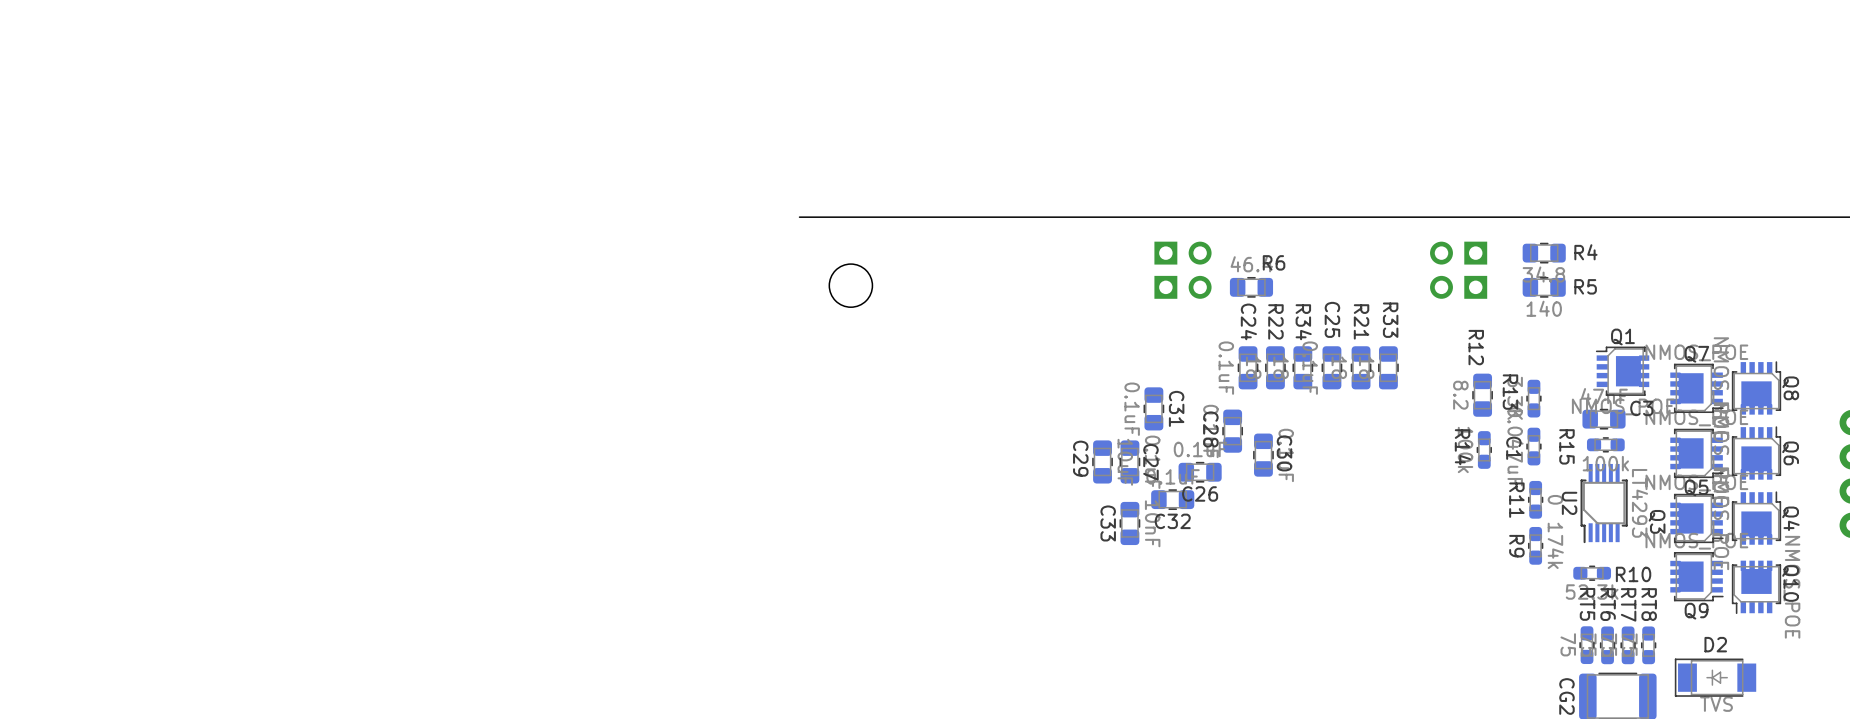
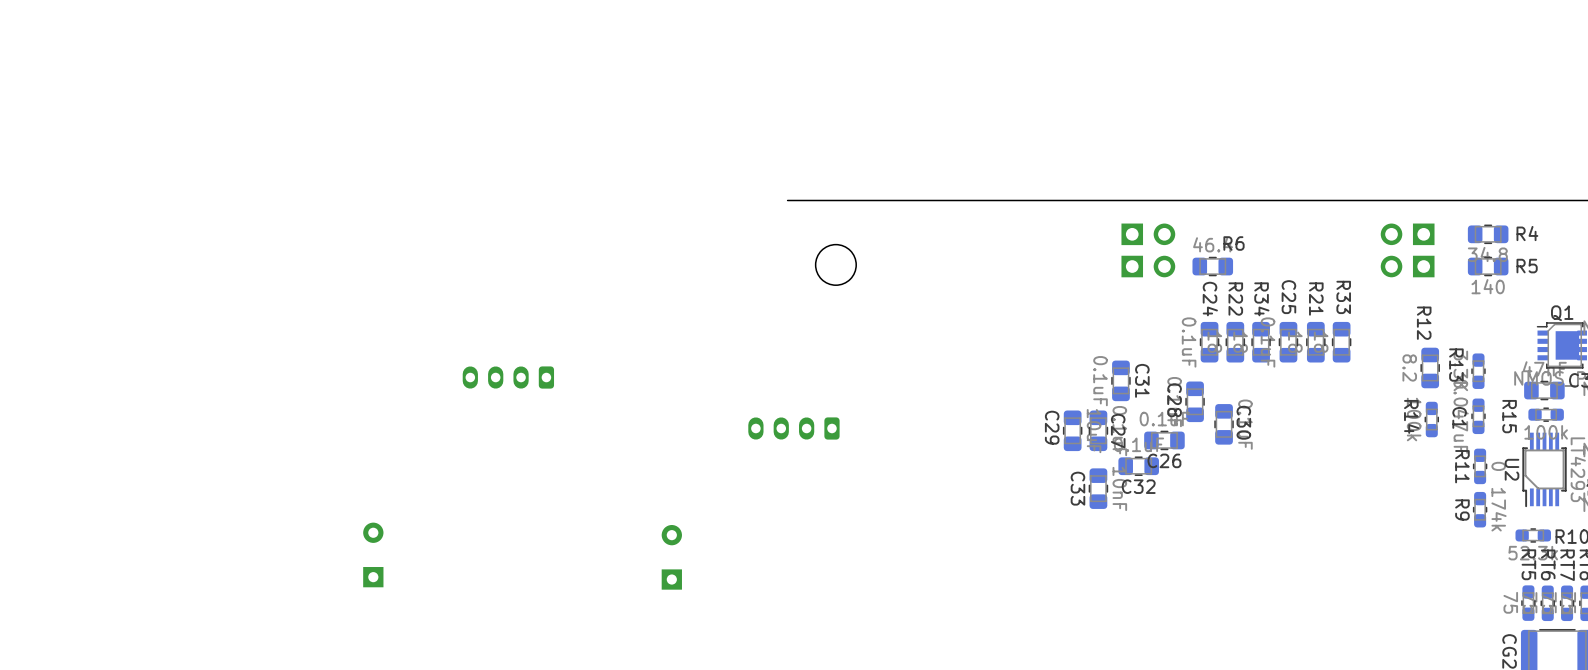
part: none -> (508, 377)
part: none -> (793, 428)
part: none -> (373, 554)
part: none -> (671, 557)

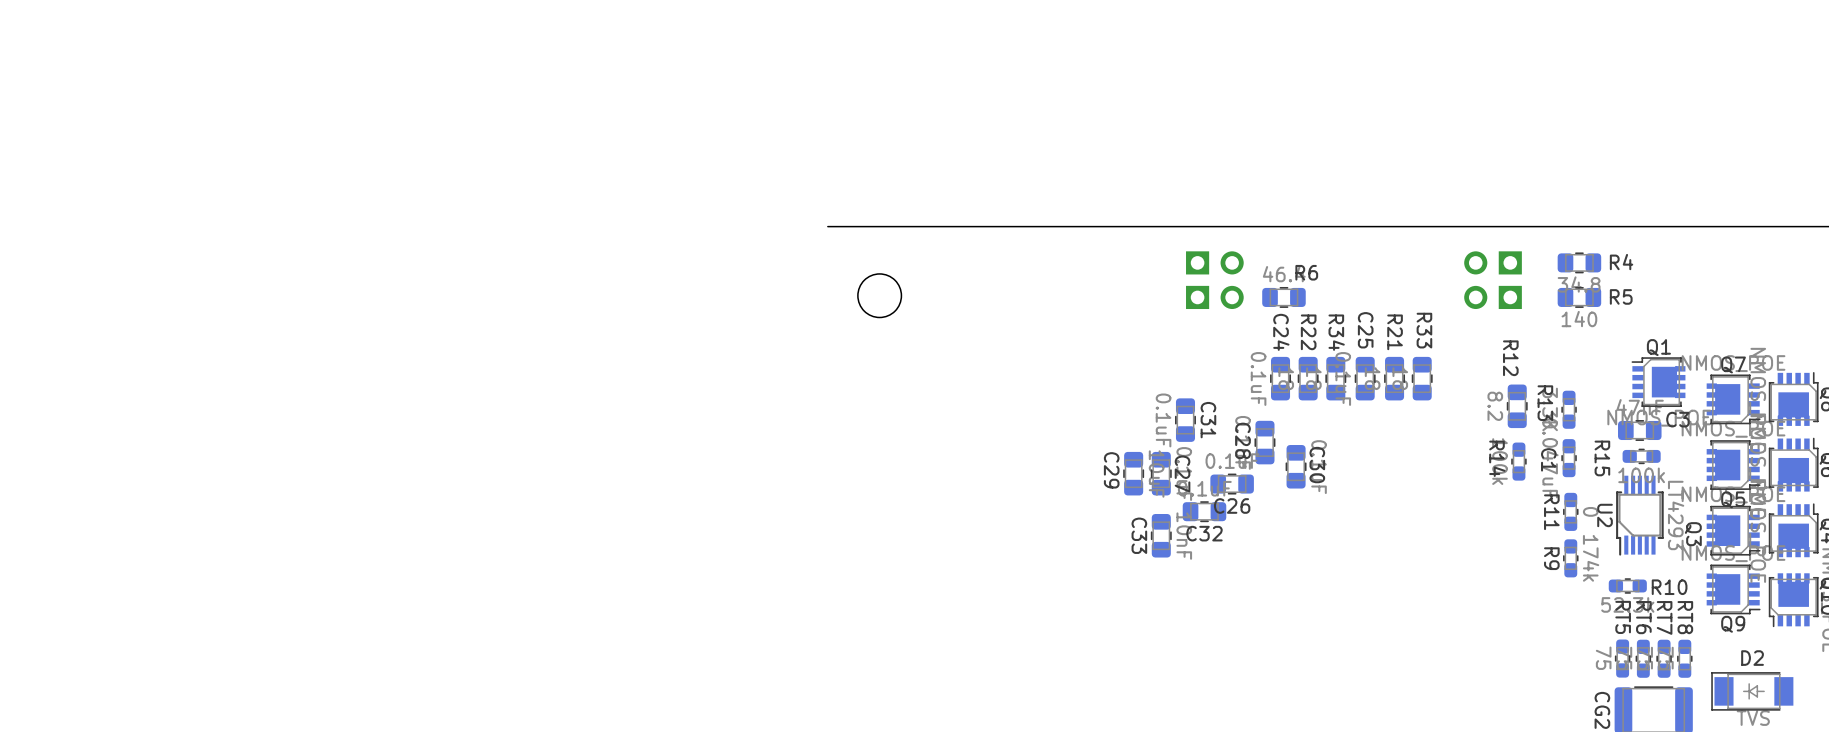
part: (508, 377) -> none
part: (793, 428) -> none
part: (373, 554) -> none
part: (671, 557) -> none

